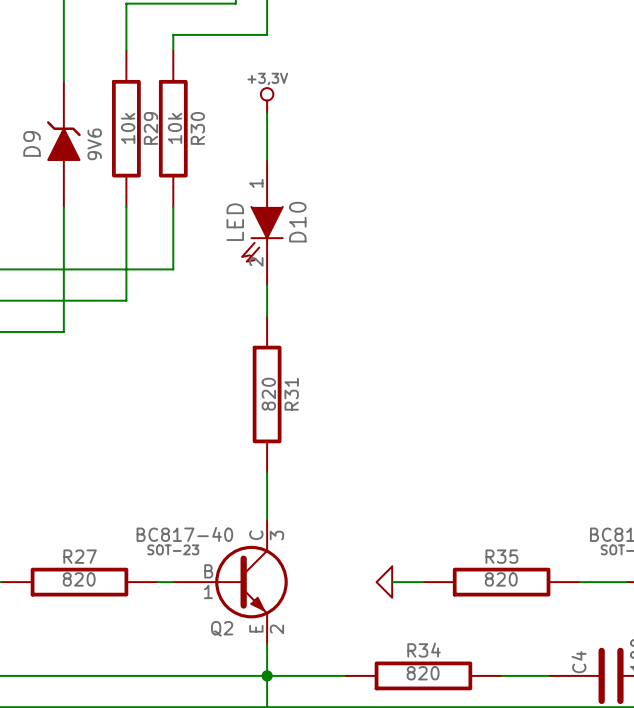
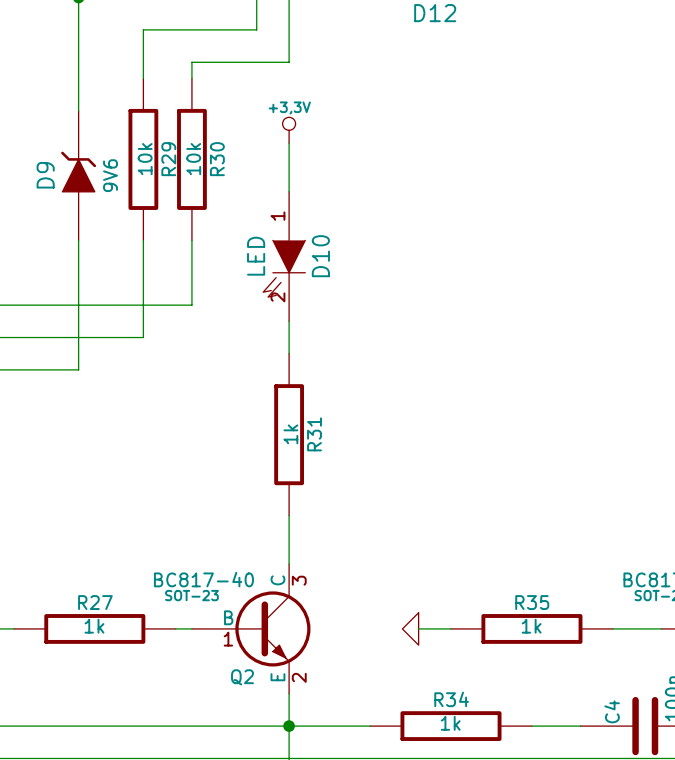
R31 value: 820 (268, 394) -> 1k (290, 434)
R27 value: 820 (79, 579) -> 1k (94, 626)
R35 value: 820 (501, 579) -> 1k (531, 626)
R34 value: 820 (423, 673) -> 1k (450, 723)

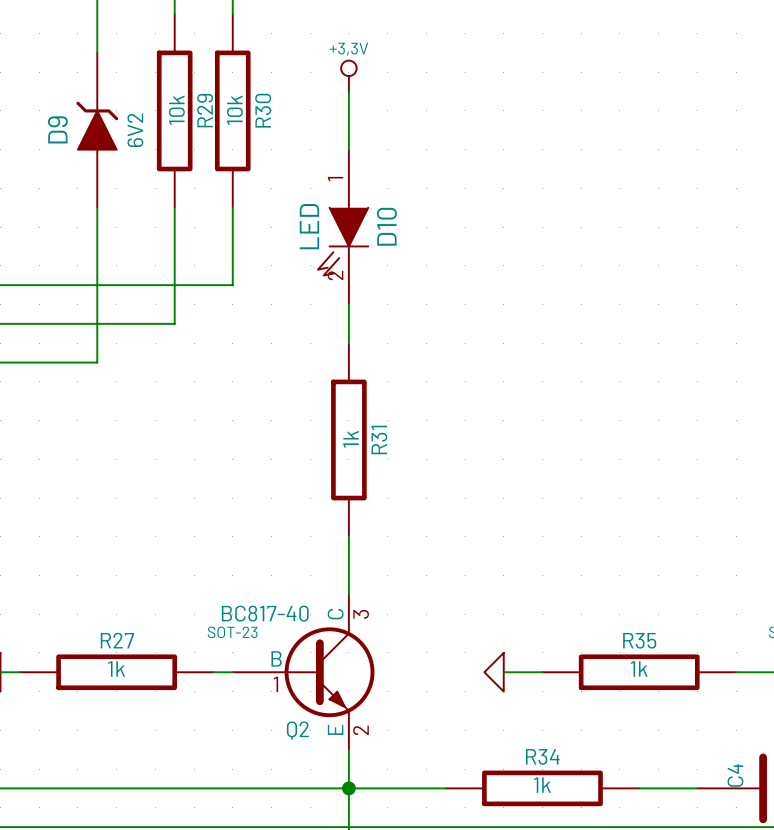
D9 value: 9V6 (110, 175) -> 6V2 (135, 130)

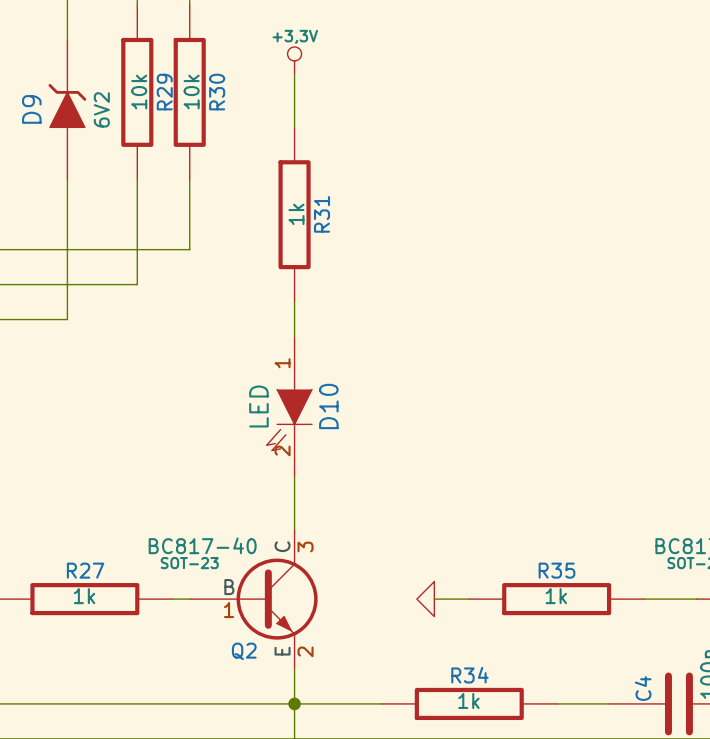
D10 position: (343, 227) -> (289, 406)
R31 position: (348, 439) -> (294, 214)

